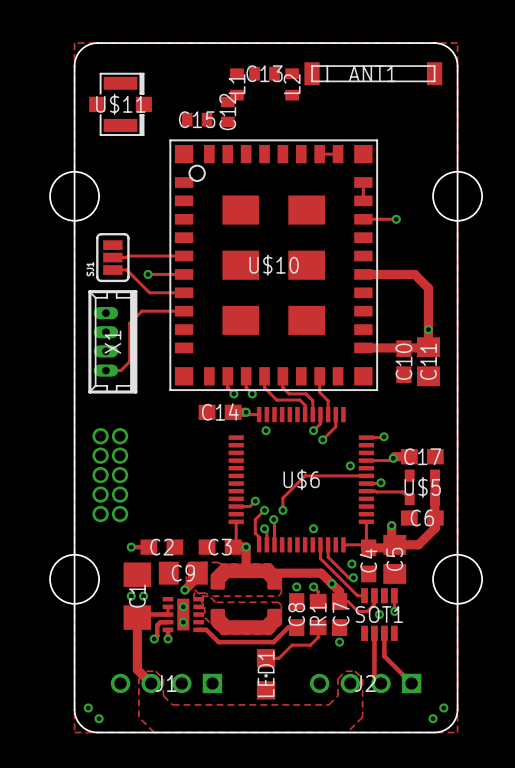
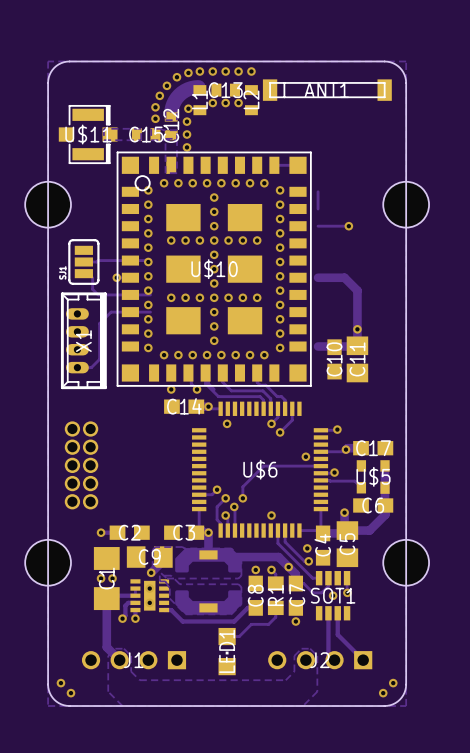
via: none -> (199, 71)
via: none -> (212, 71)
via: none -> (225, 71)
via: none -> (238, 71)
via: none -> (251, 71)
via: none -> (188, 72)
via: none -> (176, 77)
via: none -> (166, 85)
track: none -> (199, 87) (188, 89) (179, 95) (173, 104) (171, 114)
via: none -> (159, 95)
via: none -> (212, 103)
via: none -> (225, 103)
via: none -> (238, 103)
via: none -> (155, 107)
via: none -> (188, 108)
zone outline: none -> (165, 111) (165, 120) (176, 120) (176, 111) (165, 111)
U$11 position: (120, 104) -> (88, 134)
via: none -> (155, 118)
via: none -> (187, 121)
C12 position: (227, 112) -> (171, 125)
zone outline: none -> (103, 128) (141, 128) (141, 140) (103, 140) (103, 128)
C15 position: (197, 119) -> (146, 134)
via: none -> (187, 134)
zone outline: none -> (176, 138) (165, 138) (165, 173) (176, 173) (176, 130) (151, 128) (151, 140) (176, 140)
via: none -> (187, 147)
via: none -> (164, 183)
via: none -> (178, 183)
via: none -> (192, 183)
via: none -> (207, 183)
via: none -> (221, 183)
via: none -> (235, 183)
via: none -> (250, 183)
via: none -> (264, 183)
via: none -> (148, 190)
via: none -> (280, 190)
via: none -> (214, 197)
via: none -> (148, 204)
via: none -> (280, 204)
via: none -> (214, 211)
via: none -> (148, 219)
via: none -> (280, 219)
via: none -> (214, 226)
via: none -> (148, 233)
via: none -> (280, 233)
via: none -> (171, 240)
via: none -> (185, 240)
via: none -> (199, 240)
via: none -> (214, 240)
via: none -> (228, 240)
via: none -> (242, 240)
via: none -> (257, 240)
via: none -> (148, 247)
via: none -> (280, 247)
via: none -> (214, 254)
via: none -> (148, 261)
via: none -> (280, 261)
via: none -> (214, 269)
U$10 position: (273, 265) -> (214, 269)
track: (112, 270) (126, 270) (149, 292) -> (92, 277) (92, 289) (98, 294) (118, 294)
via: none -> (148, 276)
via: none -> (280, 276)
track: (162, 274) (184, 274) -> none
track: (391, 274) (414, 274) (428, 288) (428, 347) (404, 347) -> (344, 277) (357, 290) (356, 346)
via: none -> (214, 283)
via: none -> (148, 290)
via: none -> (280, 290)
via: none -> (171, 297)
via: none -> (185, 297)
via: none -> (199, 297)
via: none -> (214, 297)
via: none -> (228, 297)
via: none -> (242, 297)
via: none -> (257, 297)
via: none -> (148, 304)
via: none -> (280, 304)
via: none -> (214, 312)
via: none -> (148, 319)
via: none -> (280, 319)
via: none -> (214, 326)
via position: (428, 329) -> (357, 329)
via: none -> (148, 333)
via: none -> (280, 333)
via: none -> (214, 340)
via: none -> (148, 347)
via: none -> (280, 347)
via: none -> (164, 355)
via: none -> (178, 355)
via: none -> (192, 355)
via: none -> (207, 355)
via: none -> (221, 355)
via: none -> (235, 355)
via: none -> (250, 355)
via: none -> (264, 355)
C10 position: (403, 361) -> (334, 359)
C11 position: (428, 361) -> (357, 359)
track: (264, 376) (264, 387) (276, 400) (301, 401) -> (205, 373) (205, 383) (218, 396) (260, 396)
track: (282, 376) (282, 387) (289, 393) (305, 393) (312, 400) (312, 403) -> (222, 373) (222, 382) (231, 390) (262, 390) (270, 398)
track: (319, 376) (319, 392) (328, 400) (328, 405) -> (257, 373) (257, 382) (260, 385) (265, 385) (277, 396) (281, 396) (285, 400)
via: none -> (171, 389)
via: (252, 393) -> none

